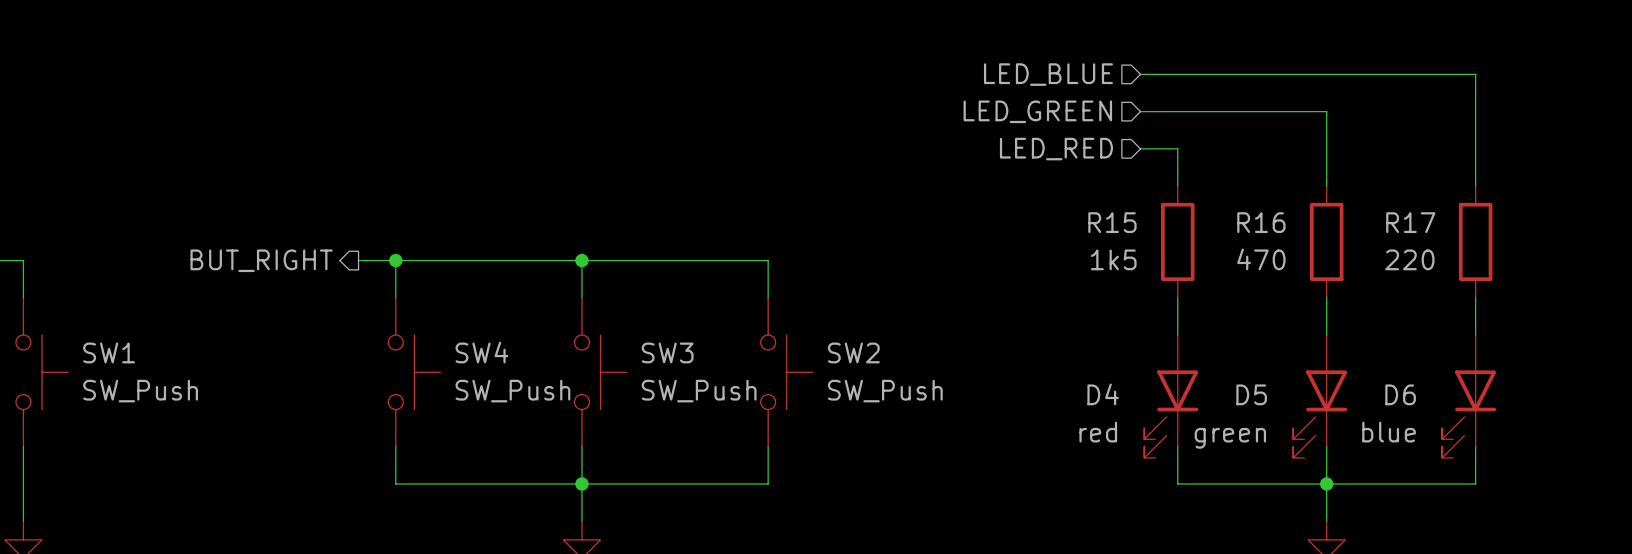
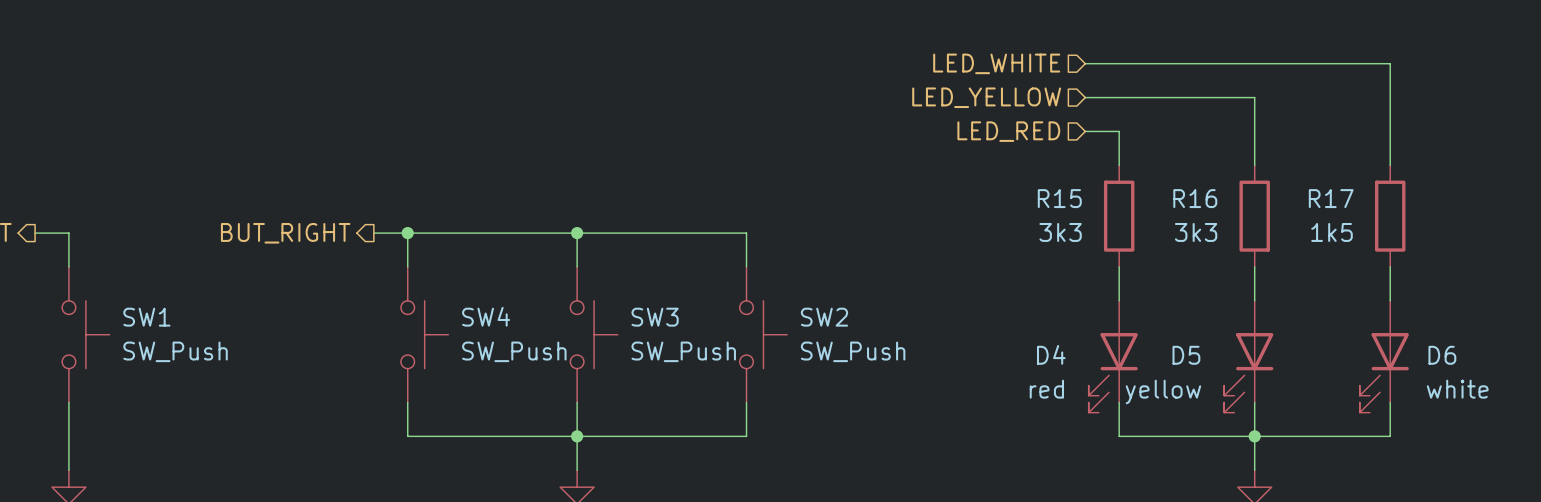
hierarchical label: LED_BLUE (1048, 74) -> LED_WHITE (996, 63)
hierarchical label: LED_GREEN (1037, 111) -> LED_YELLOW (986, 97)
R15 value: 1k5 (1113, 259) -> 3k3 (1060, 232)
R16 value: 470 (1261, 259) -> 3k3 (1196, 232)
R17 value: 220 (1409, 259) -> 1k5 (1332, 232)
D6 name position: D6 (1400, 394) -> D6 (1442, 355)
D6 value: blue (1389, 432) -> white (1457, 389)
D5 value: green (1230, 438) -> yellow (1163, 391)

